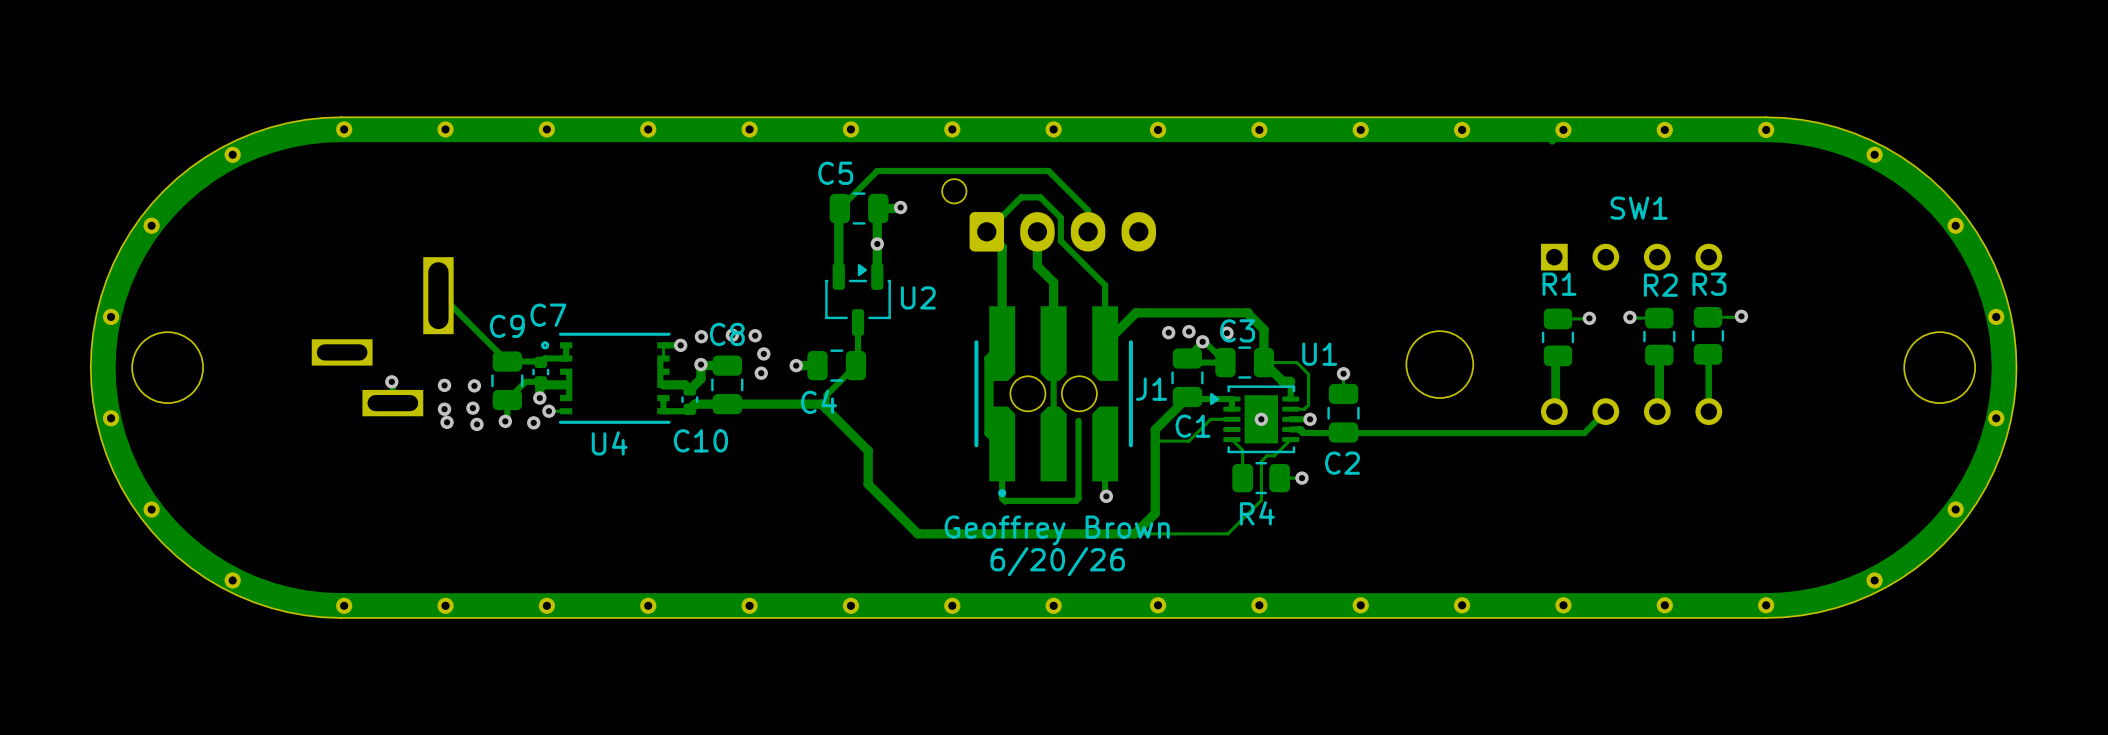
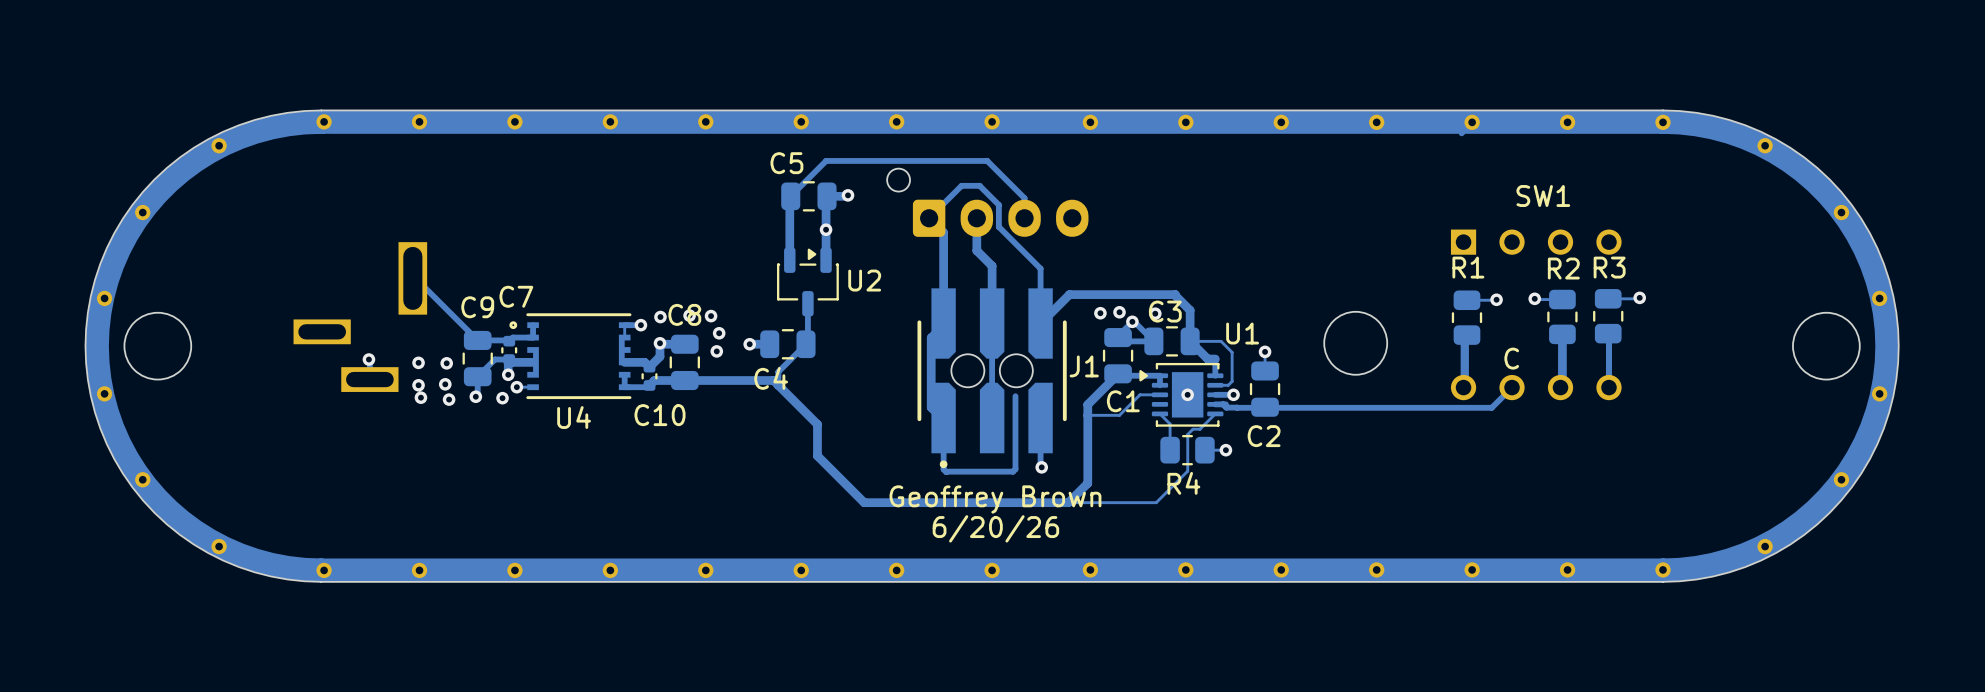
text: none -> C (1511, 358)

